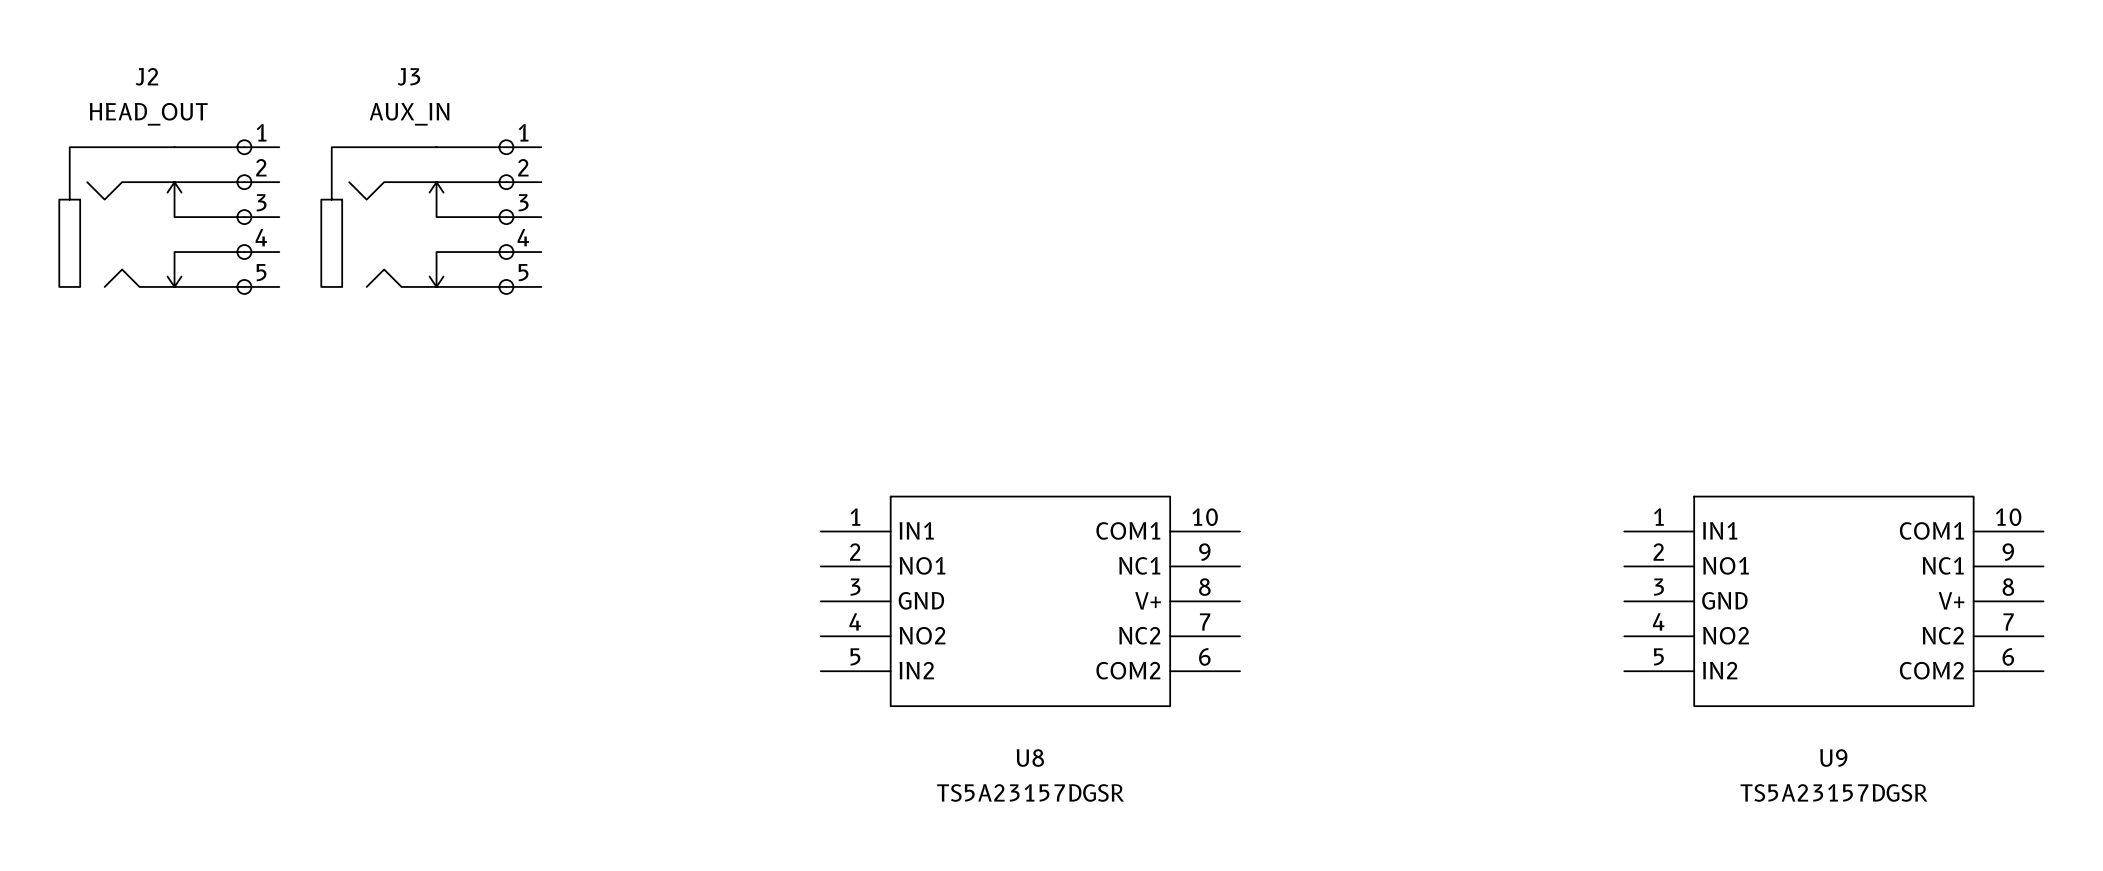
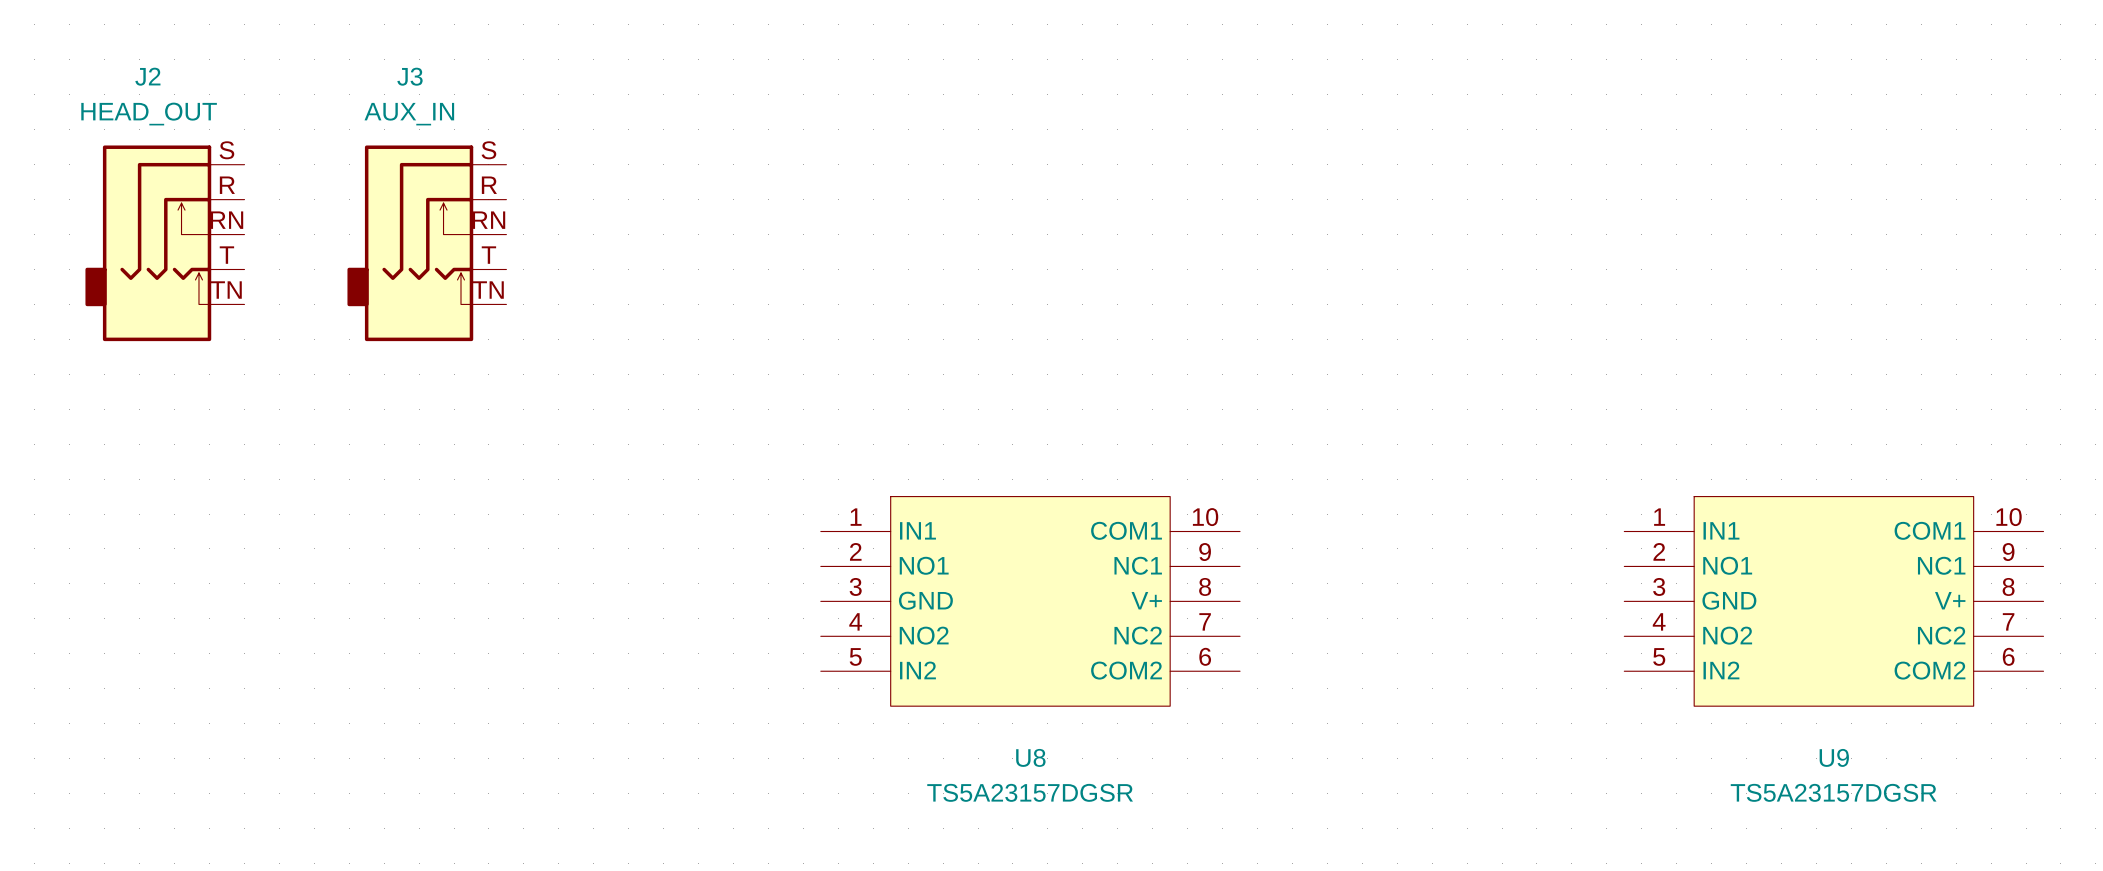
J2 symbol: [59, 140, 280, 294] -> [85, 145, 245, 342]
J3 symbol: [321, 140, 542, 294] -> [347, 145, 507, 342]

